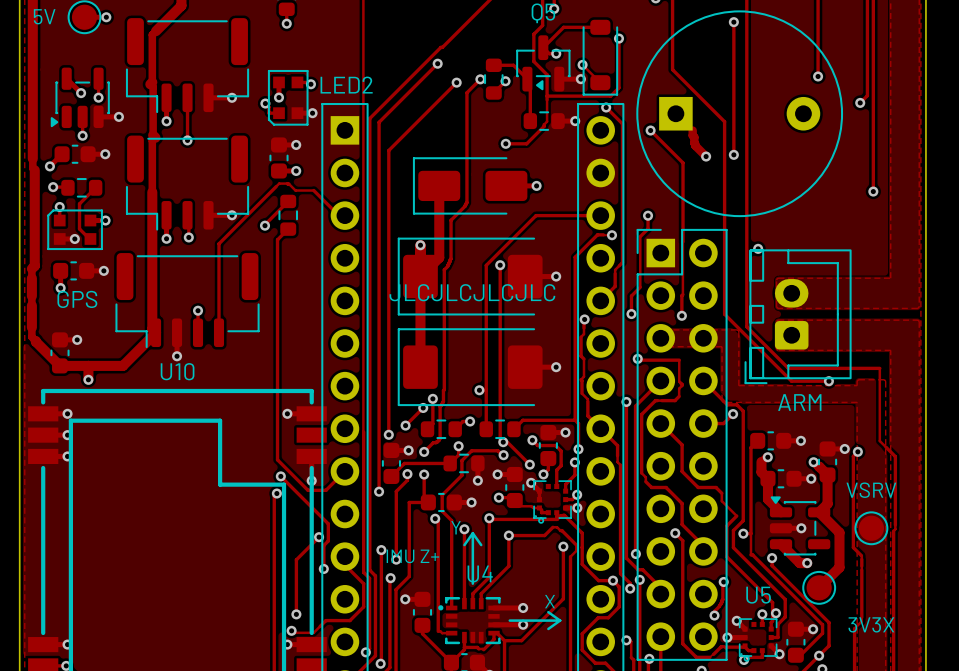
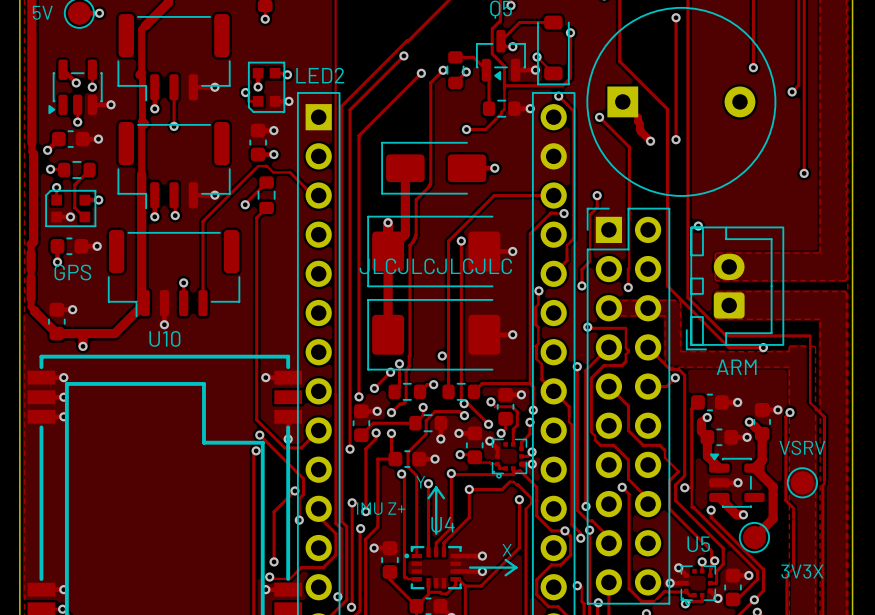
track: (723, 581) (722, 599) (714, 611) (714, 615) -> none
via: (723, 581) -> none
via: (714, 615) -> none

